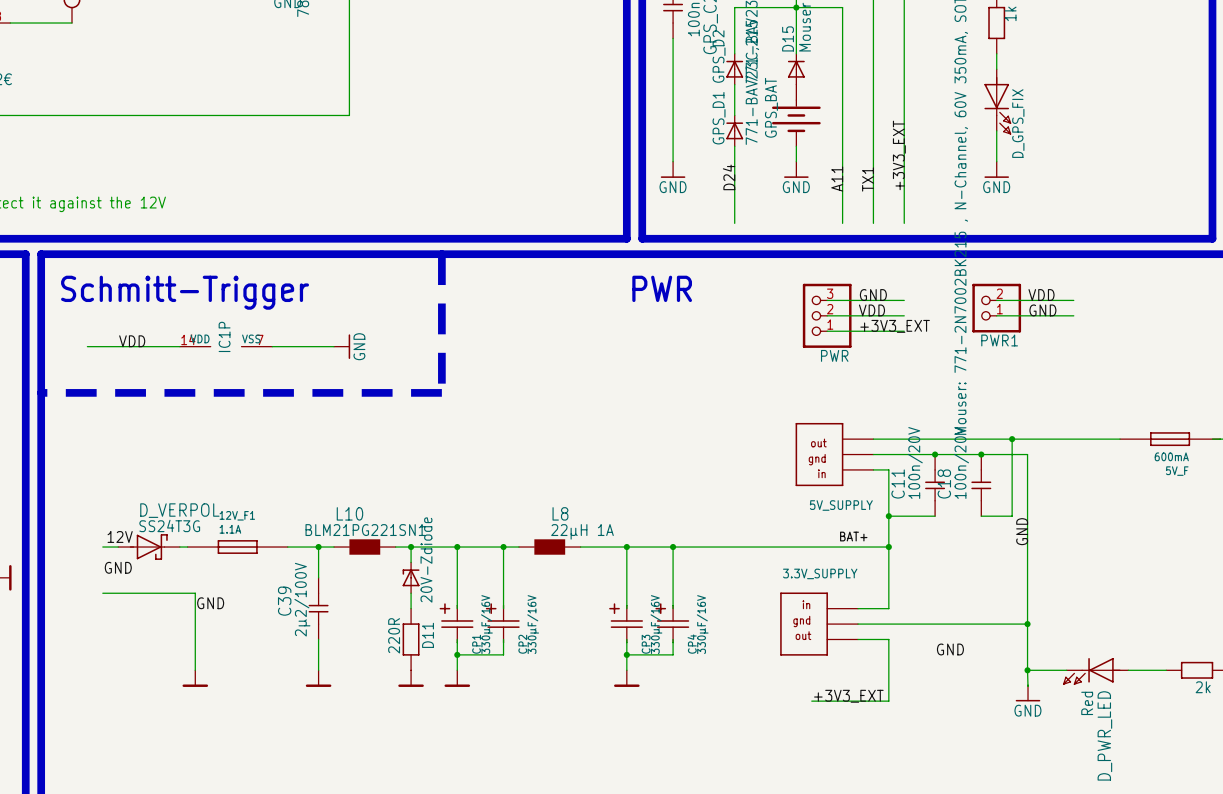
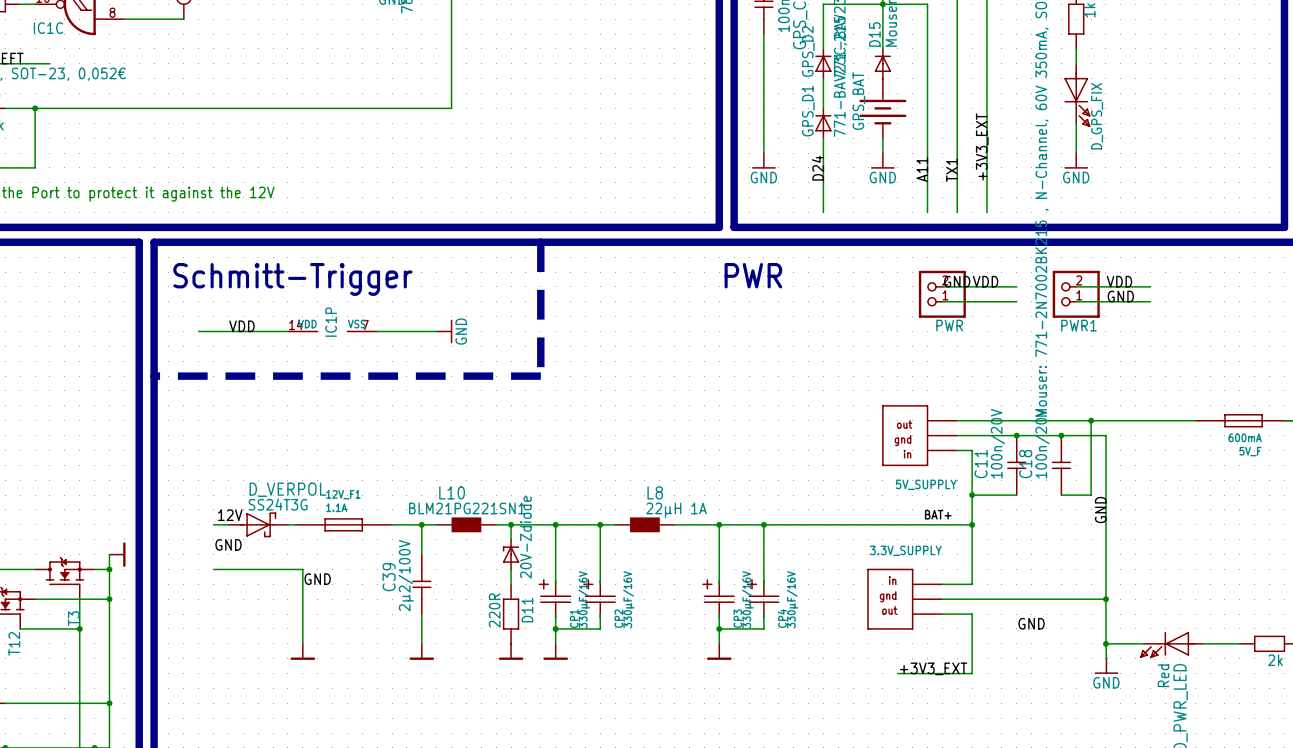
wire: (827, 300) (858, 300) -> (987, 286) (1016, 286)
PWR: none -> (942, 294)
label position: VDD (871, 310) -> VDD (985, 281)
wire: (827, 315) (858, 315) -> (987, 301) (1016, 301)
PWR: (827, 315) -> none
label: +3V3_EXT (895, 326) -> none

